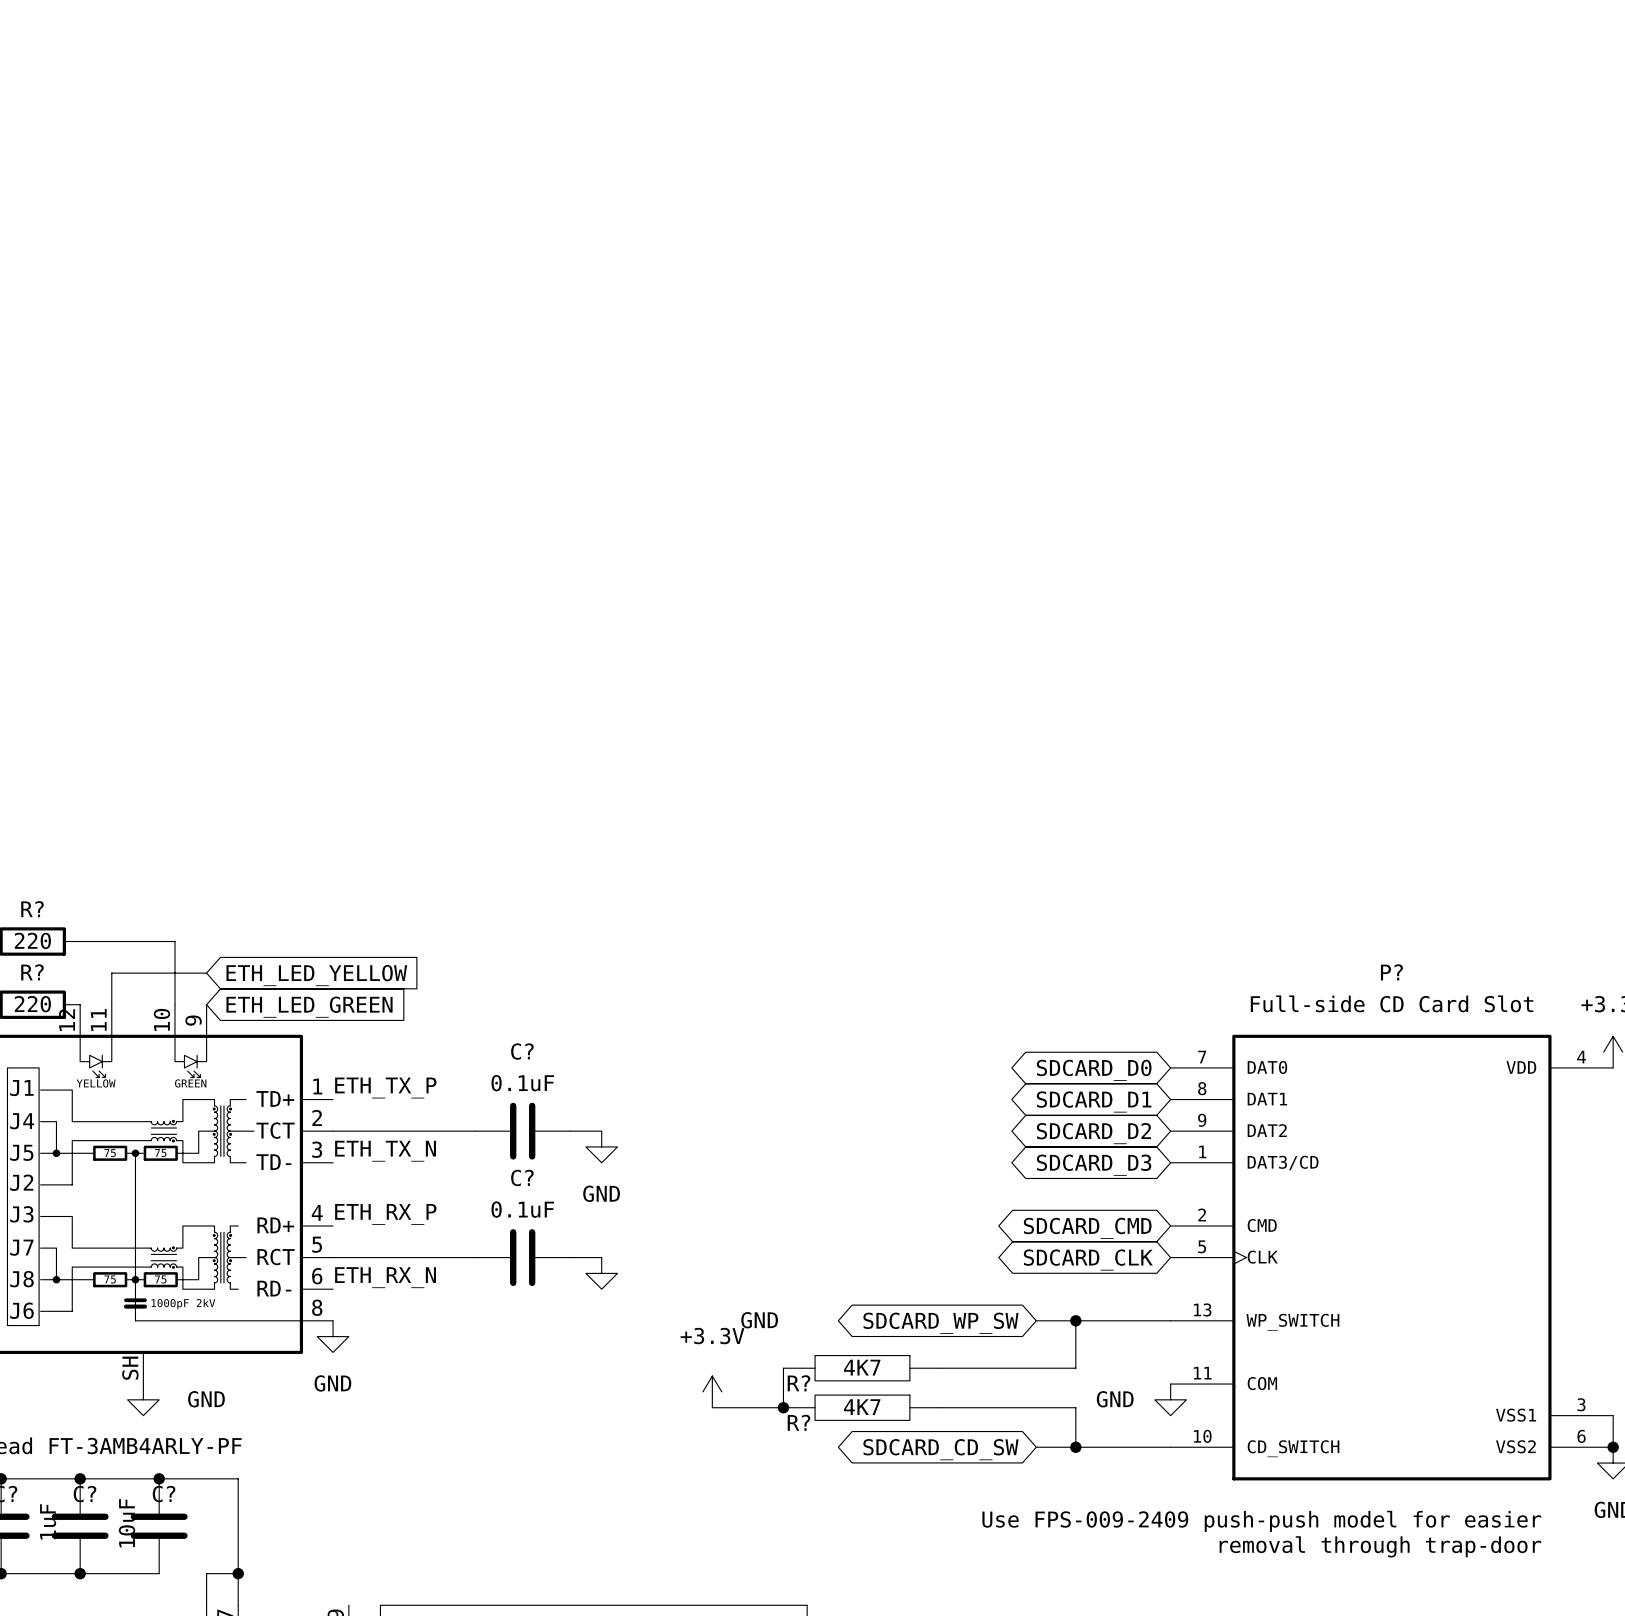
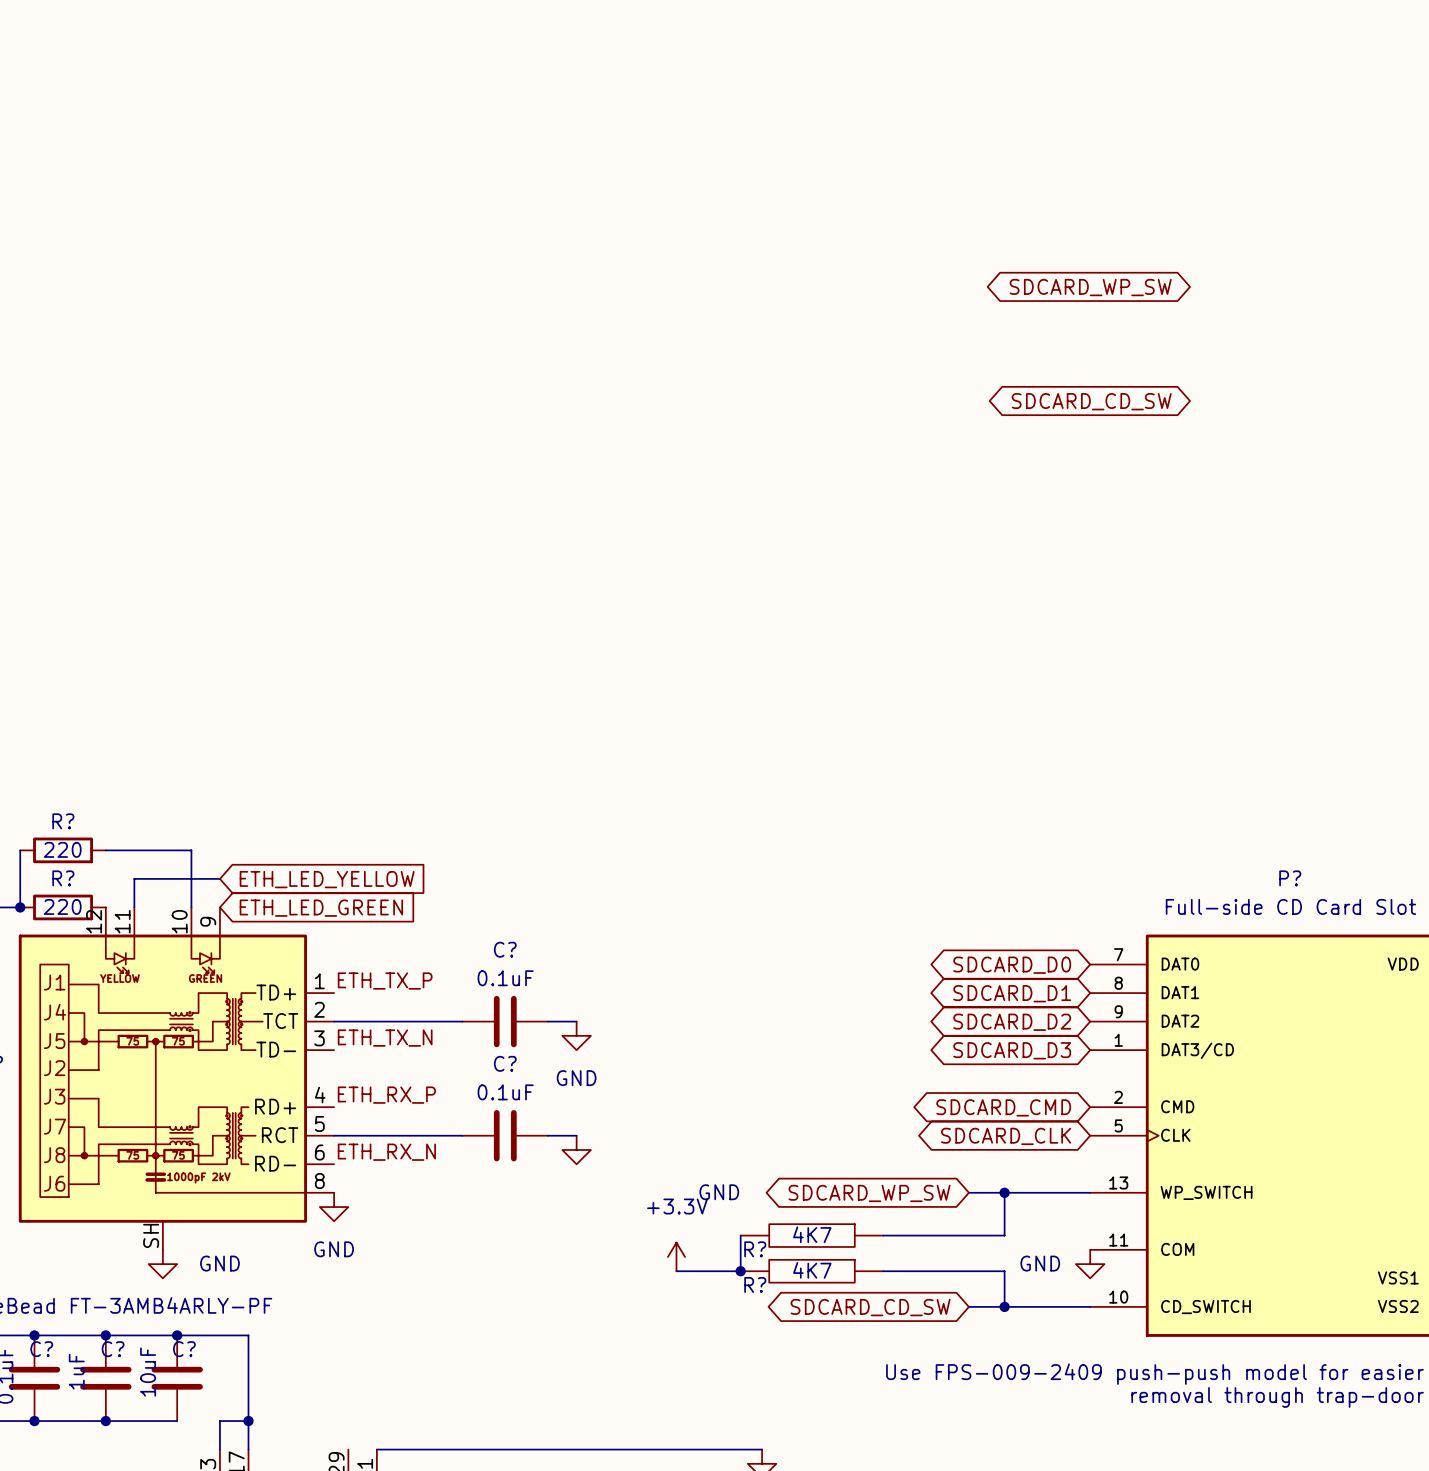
global label: none -> SDCARD_WP_SW (1090, 287)
global label: none -> SDCARD_CD_SW (1091, 401)

